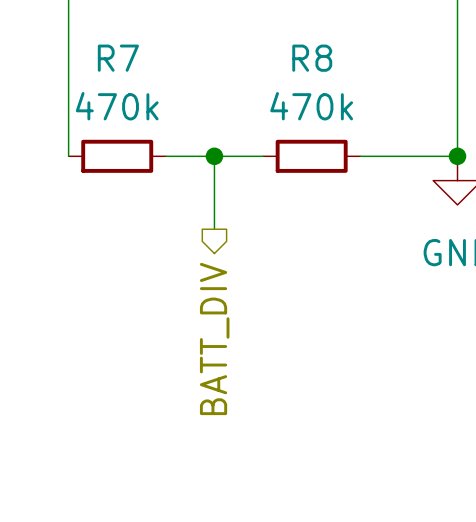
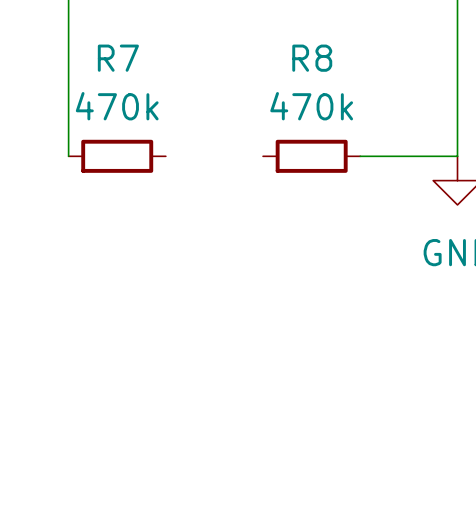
wire: (165, 156) (263, 156) -> none
wire: (214, 156) (214, 229) -> none
junction: (214, 156) -> none
junction: (457, 156) -> none
hierarchical label: BATT_DIV (214, 338) -> none

